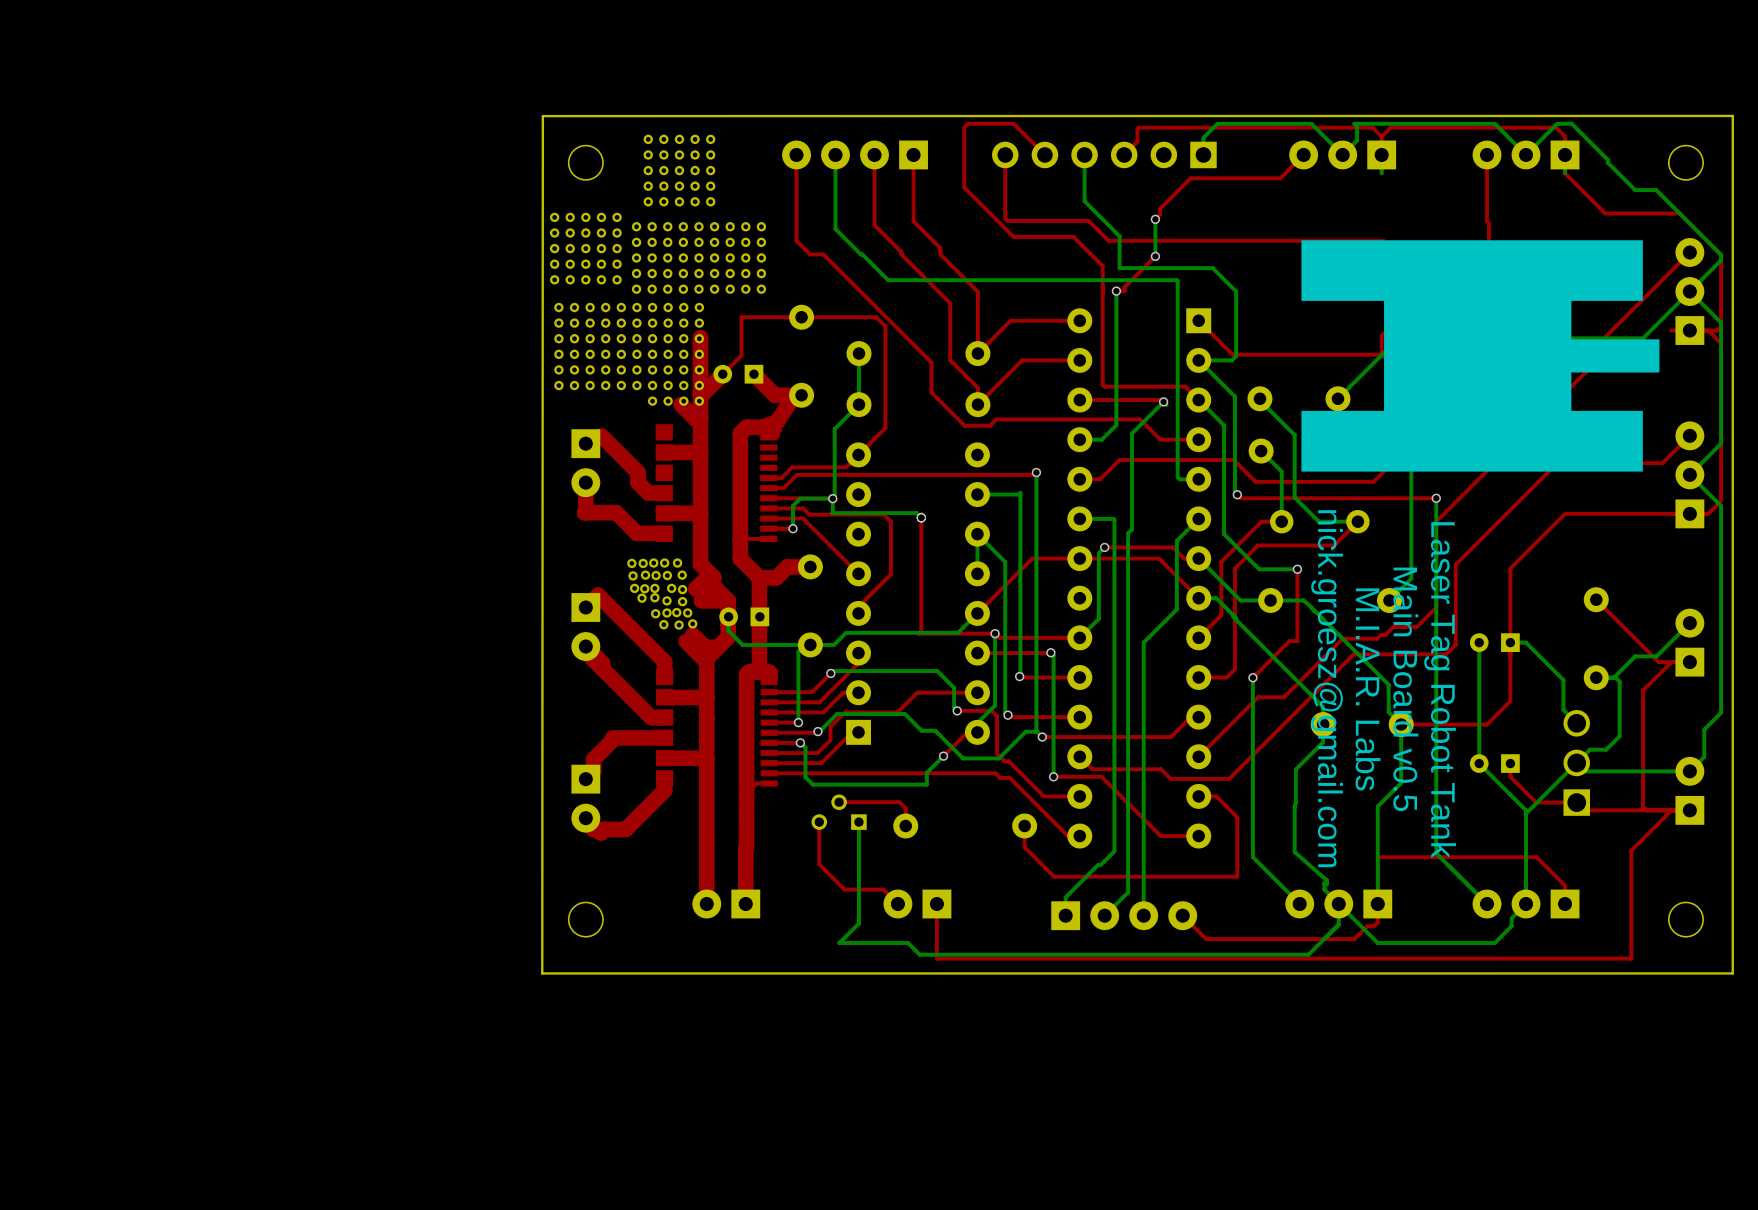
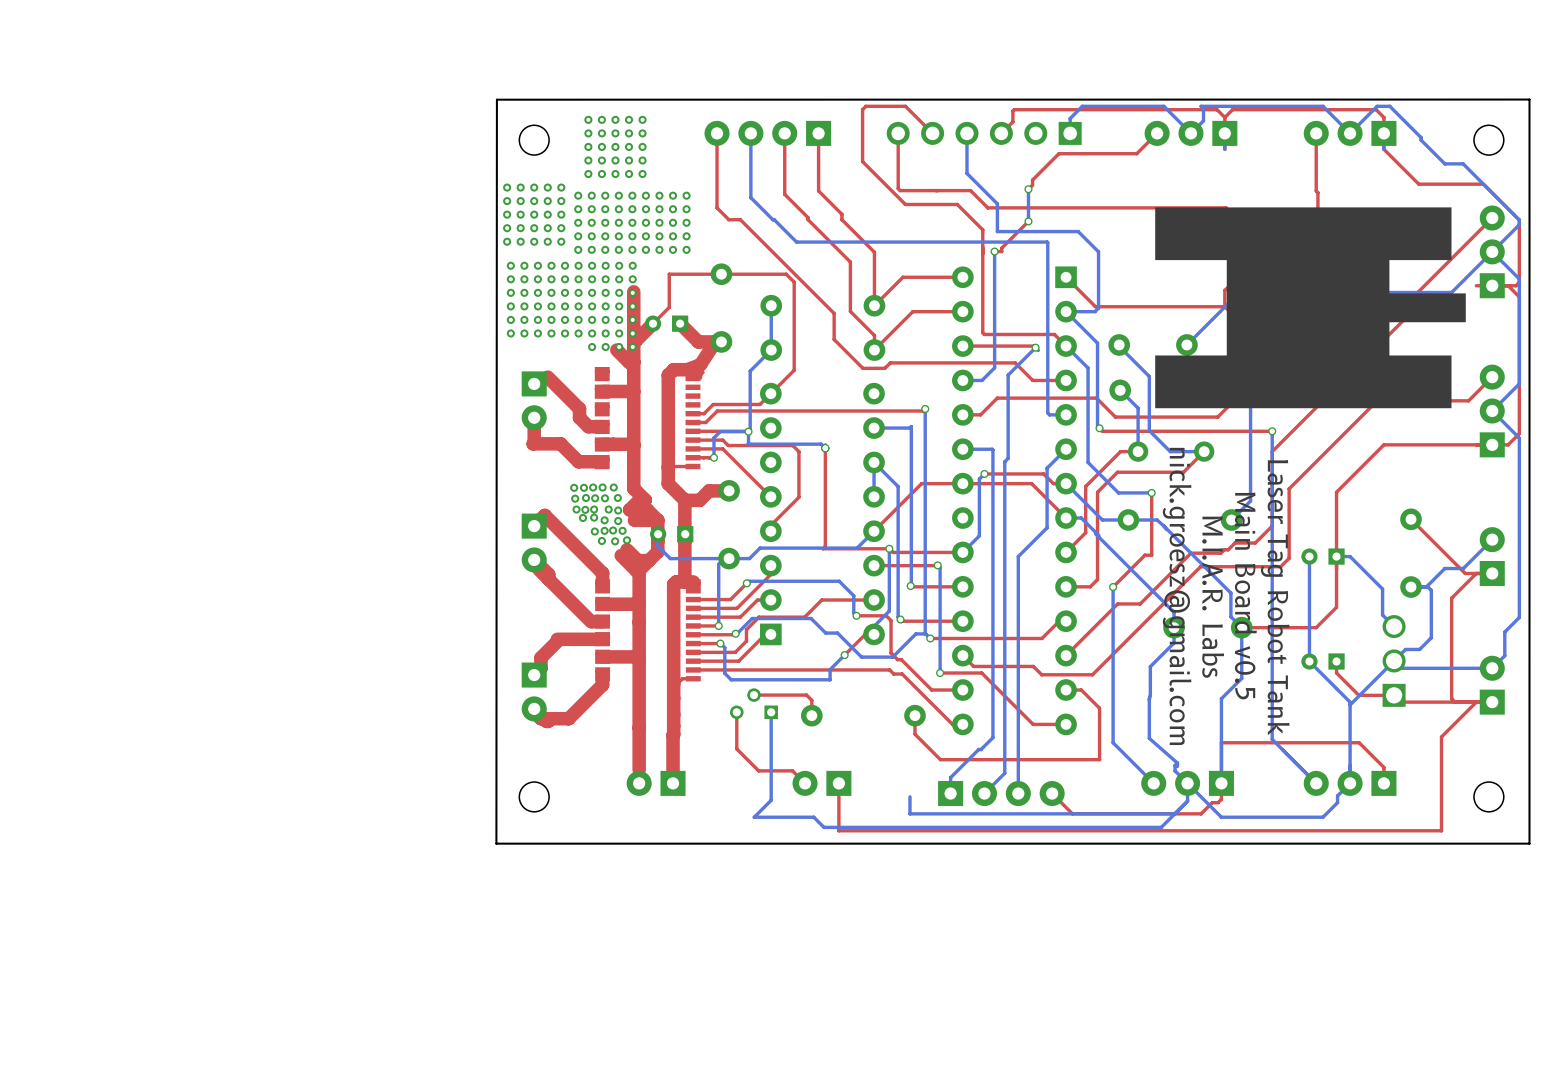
bottom track: none -> (909, 796) (909, 813) (1174, 813)

